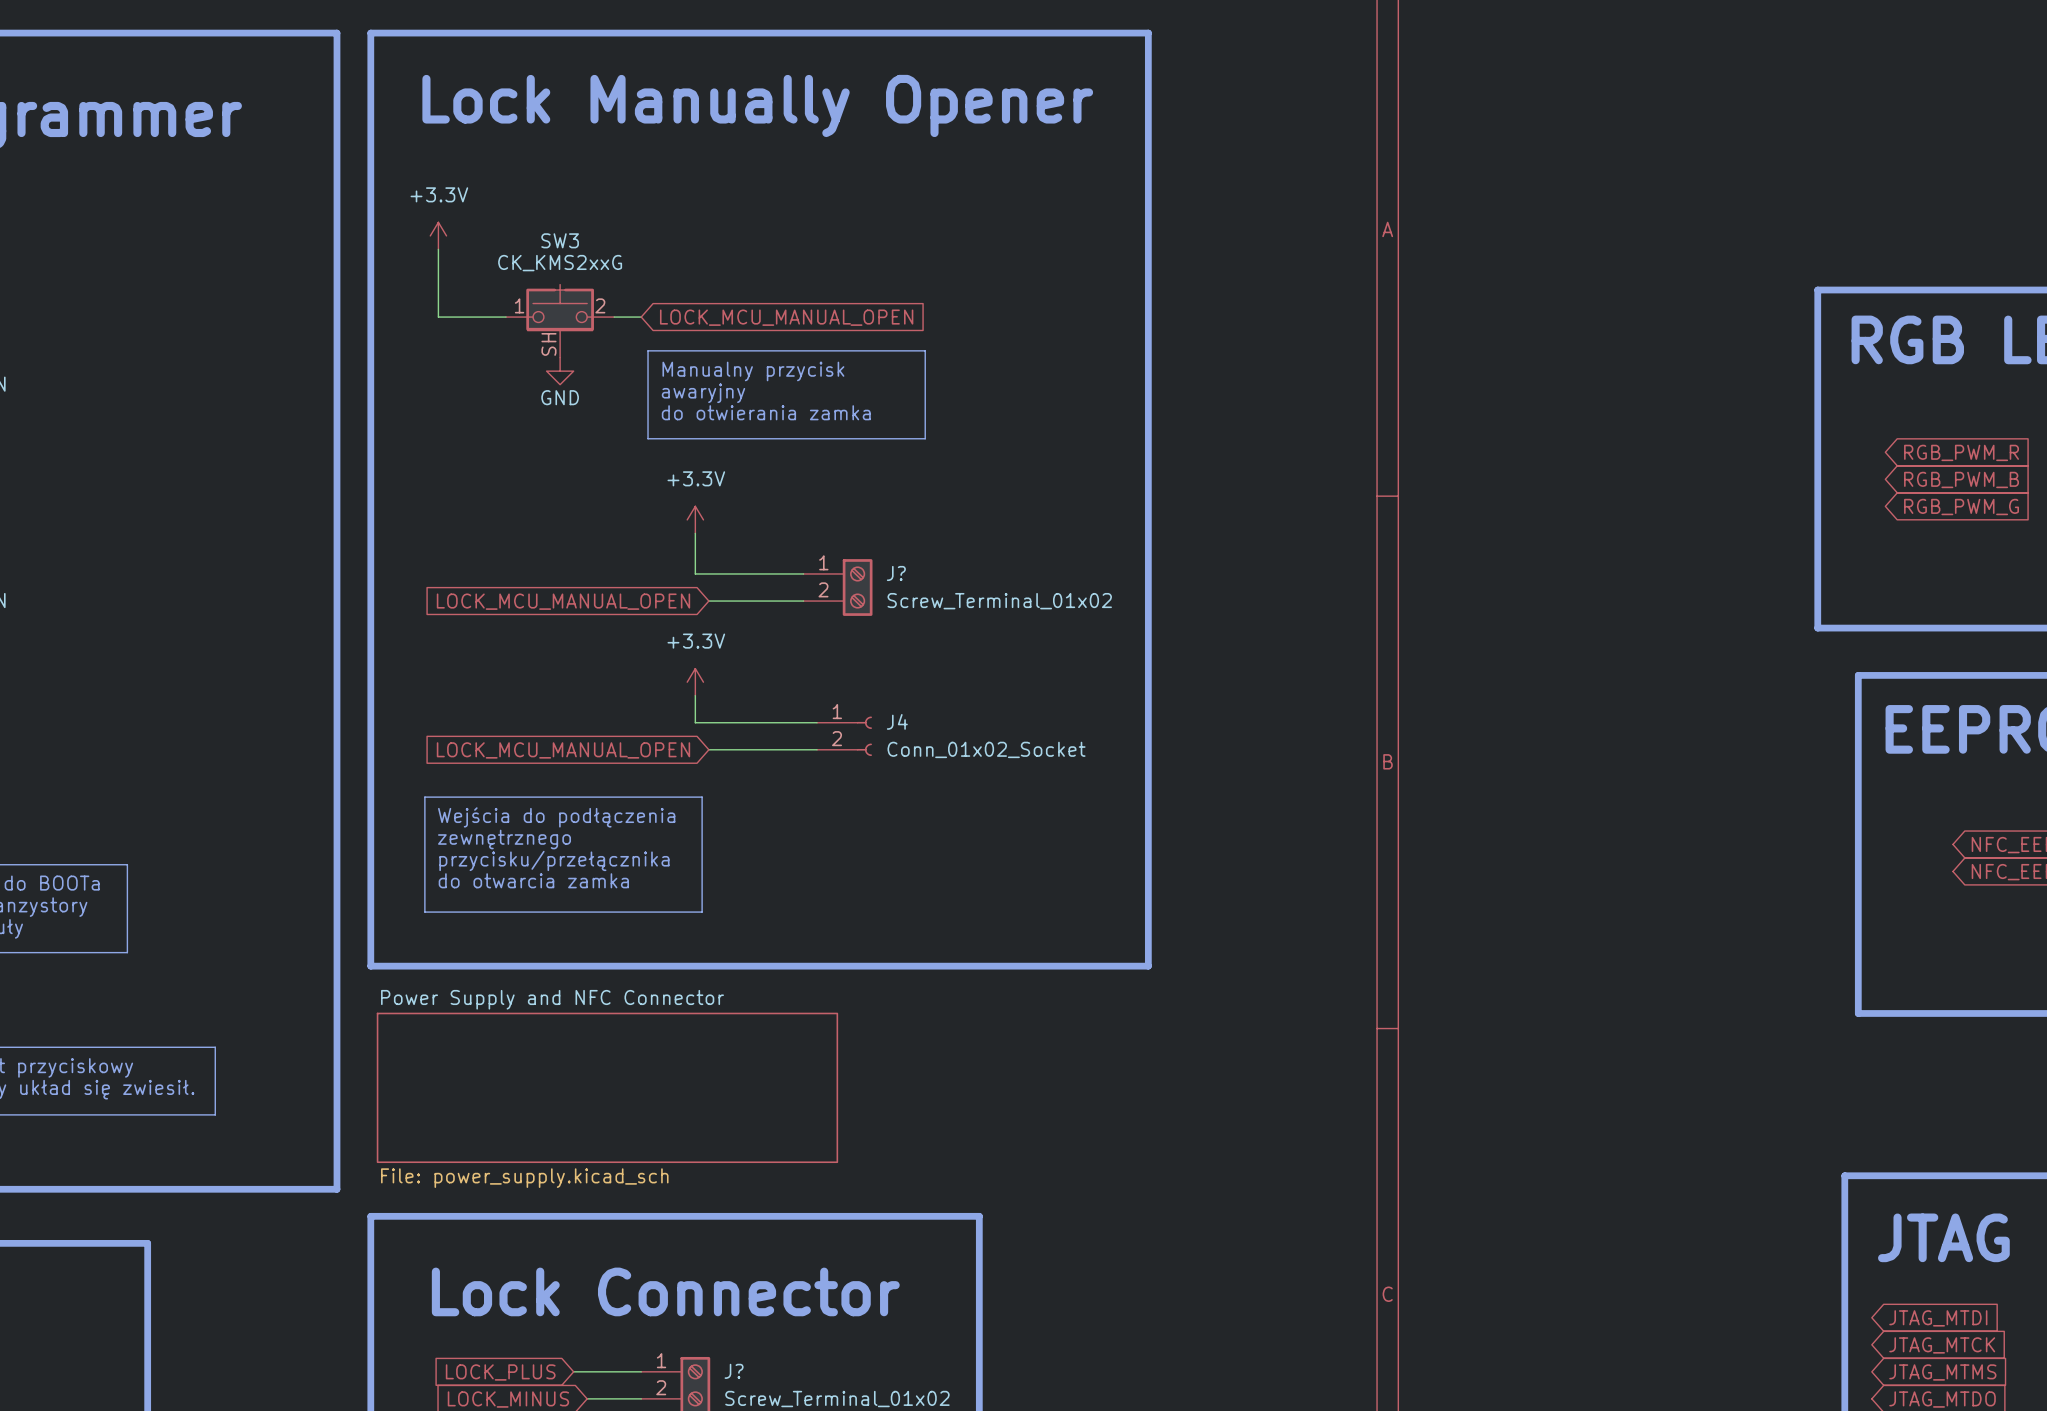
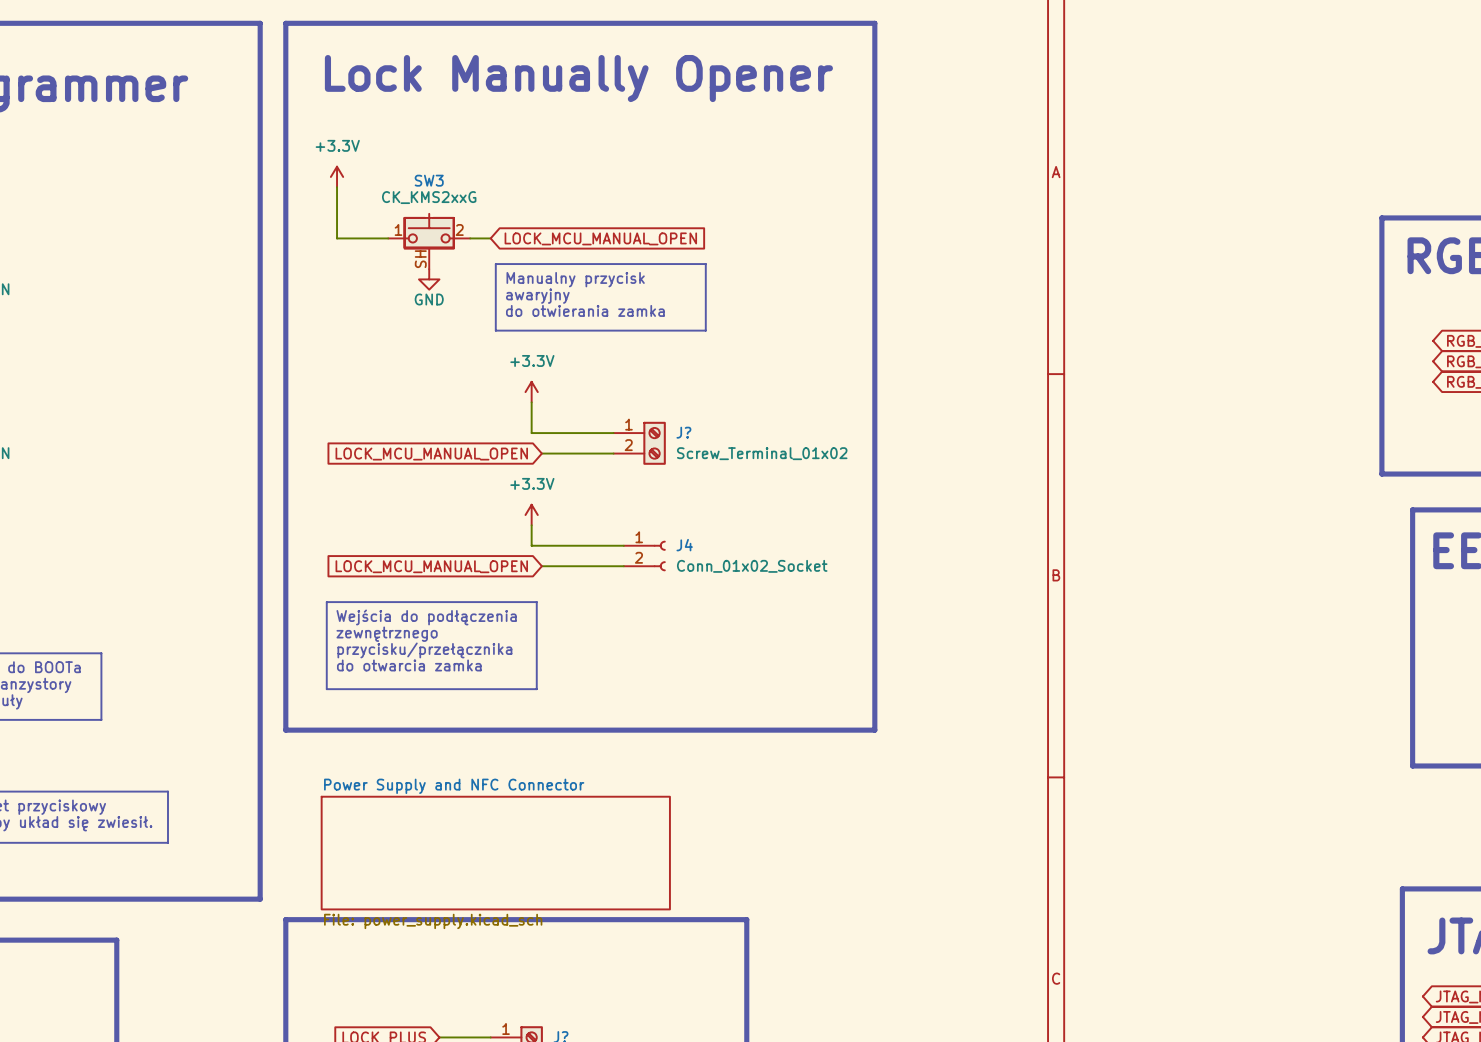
sheet Power Supply and NFC Connector position: (607, 1087) -> (495, 853)
text: Lock Connector (665, 1291) -> none

